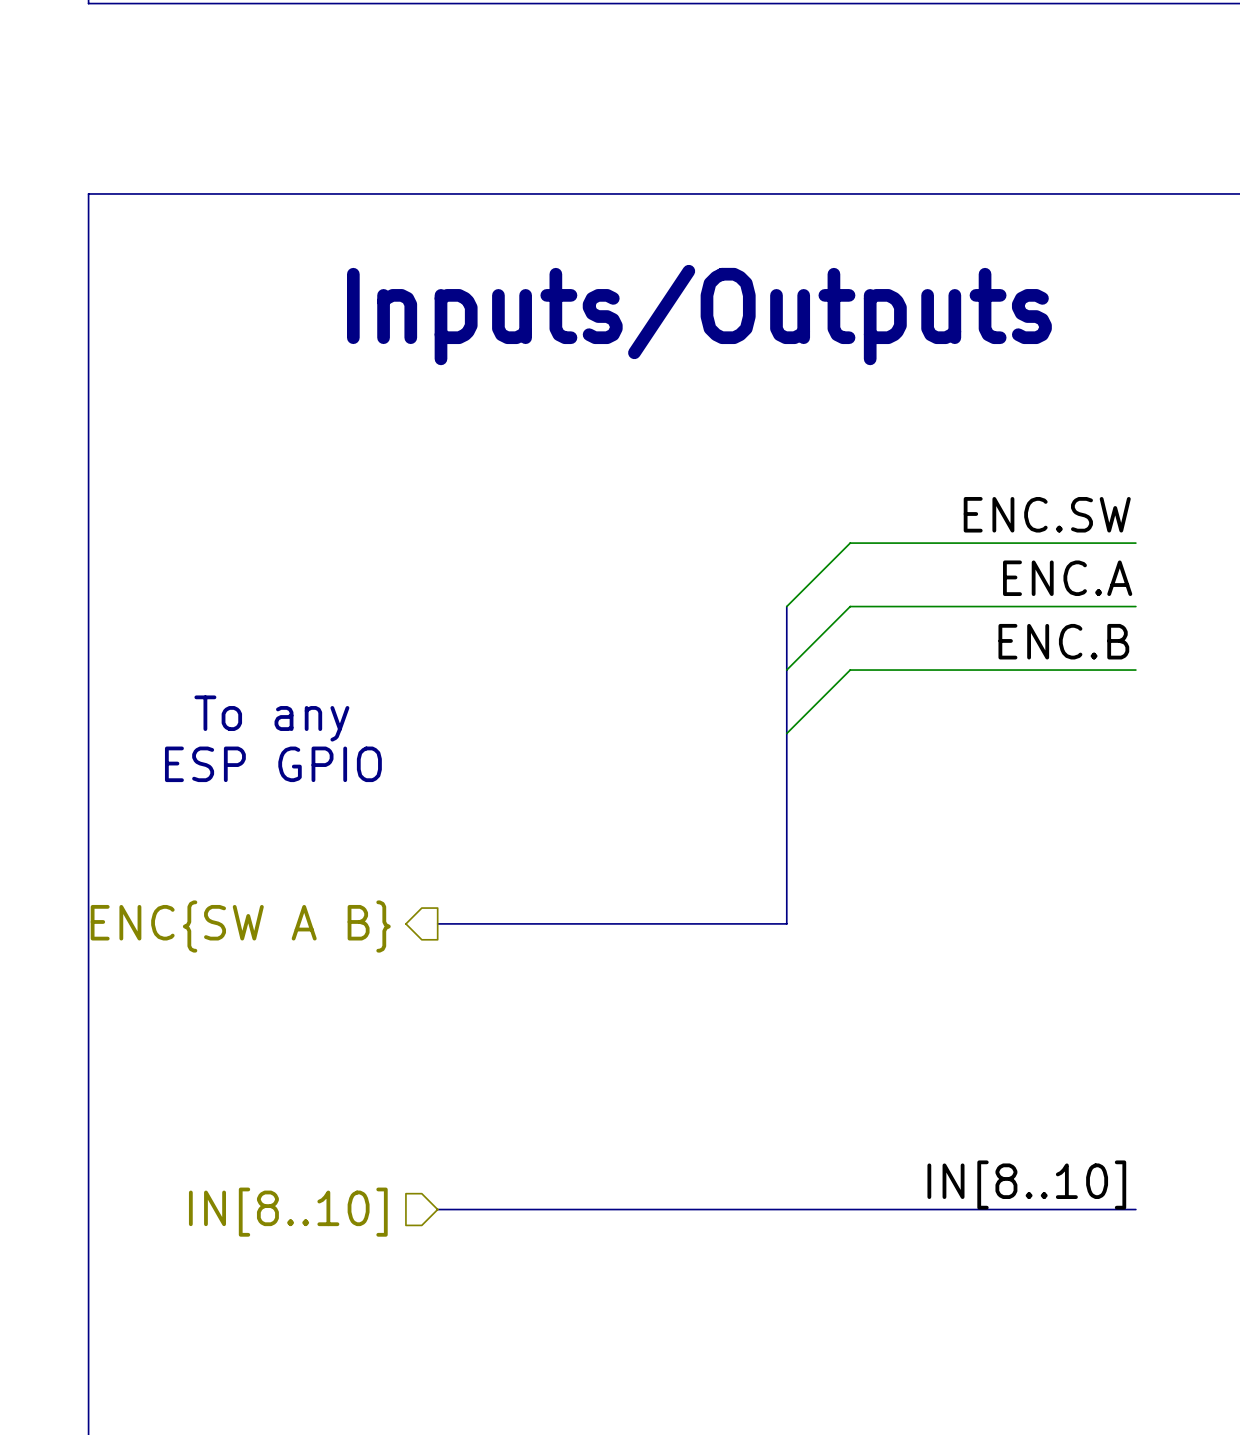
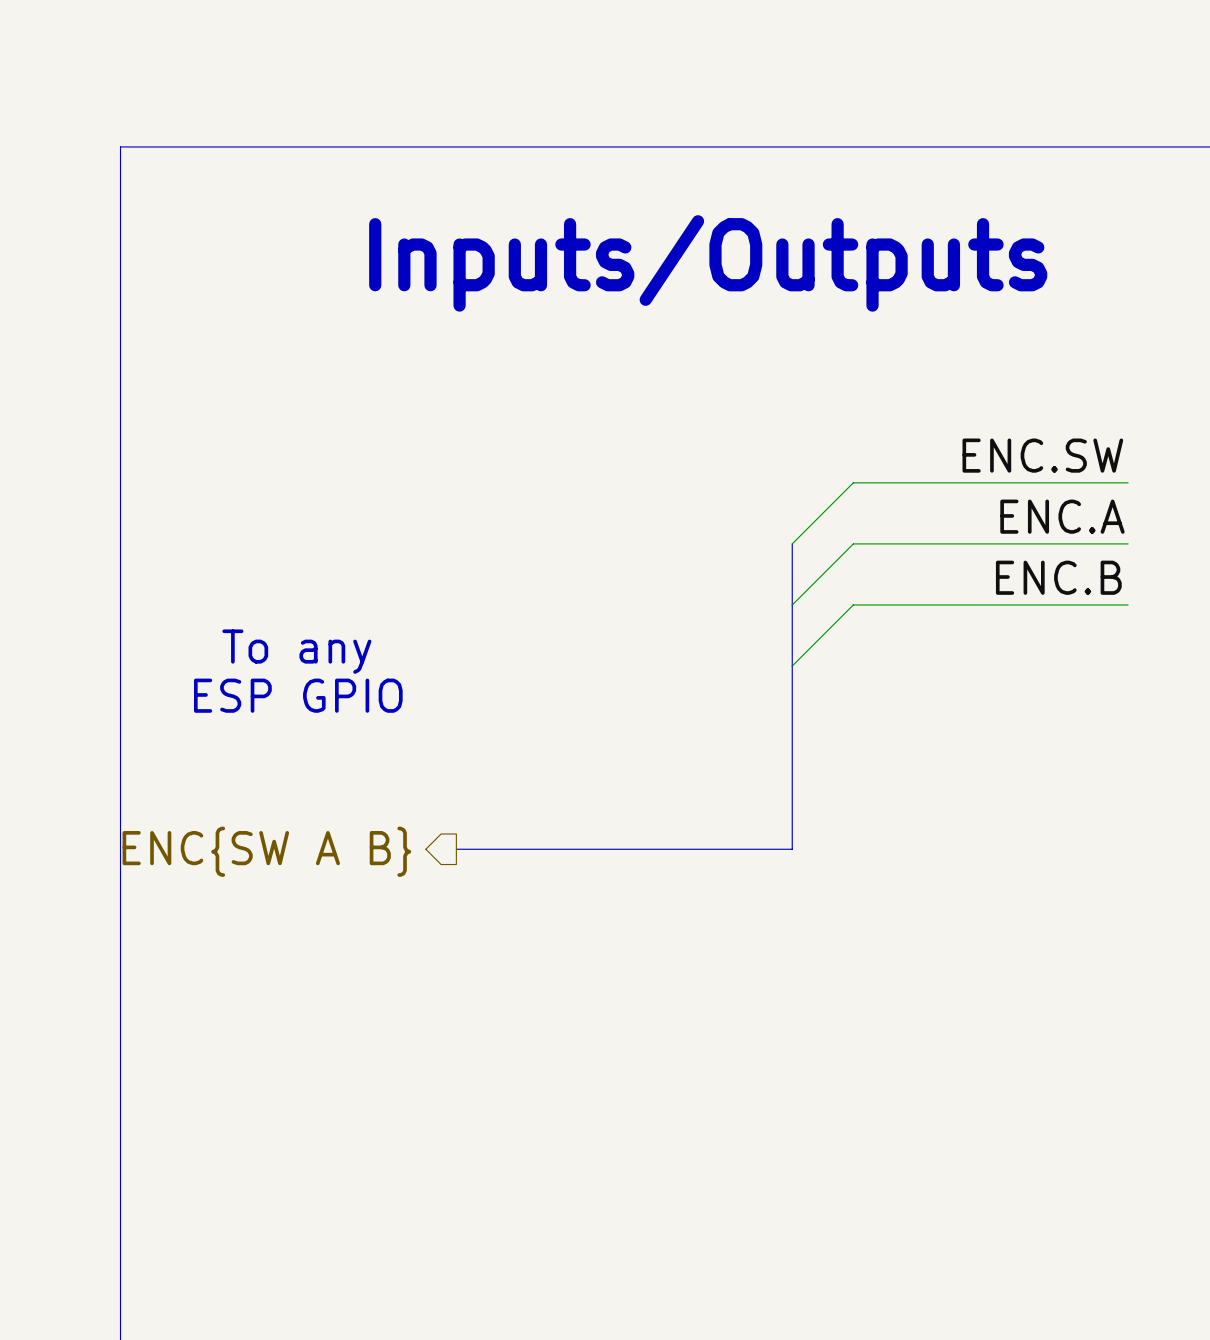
label: IN[8..10] (1026, 1185) -> none
bus: (437, 1209) (1135, 1209) -> none
hierarchical label: IN[8..10] (288, 1212) -> none

